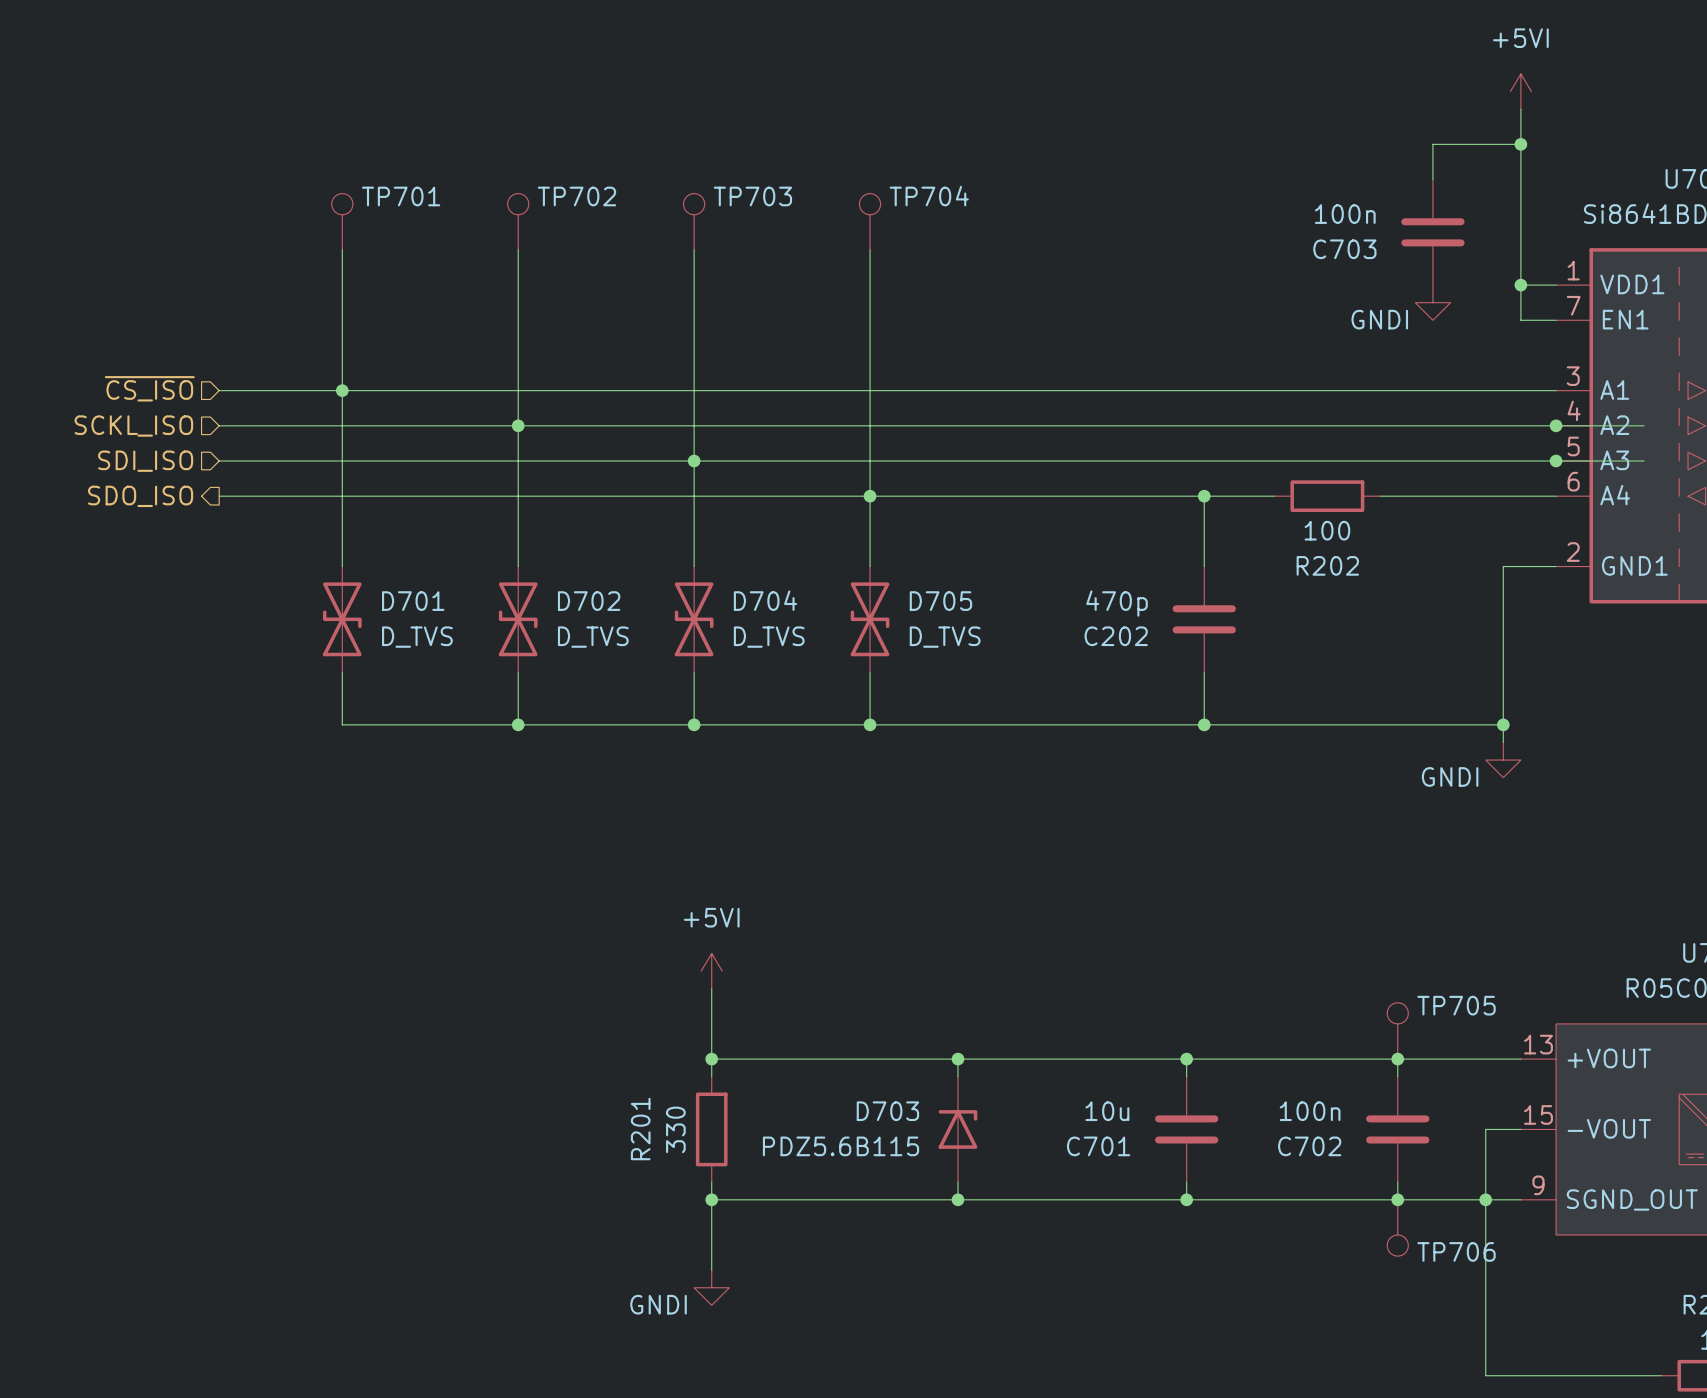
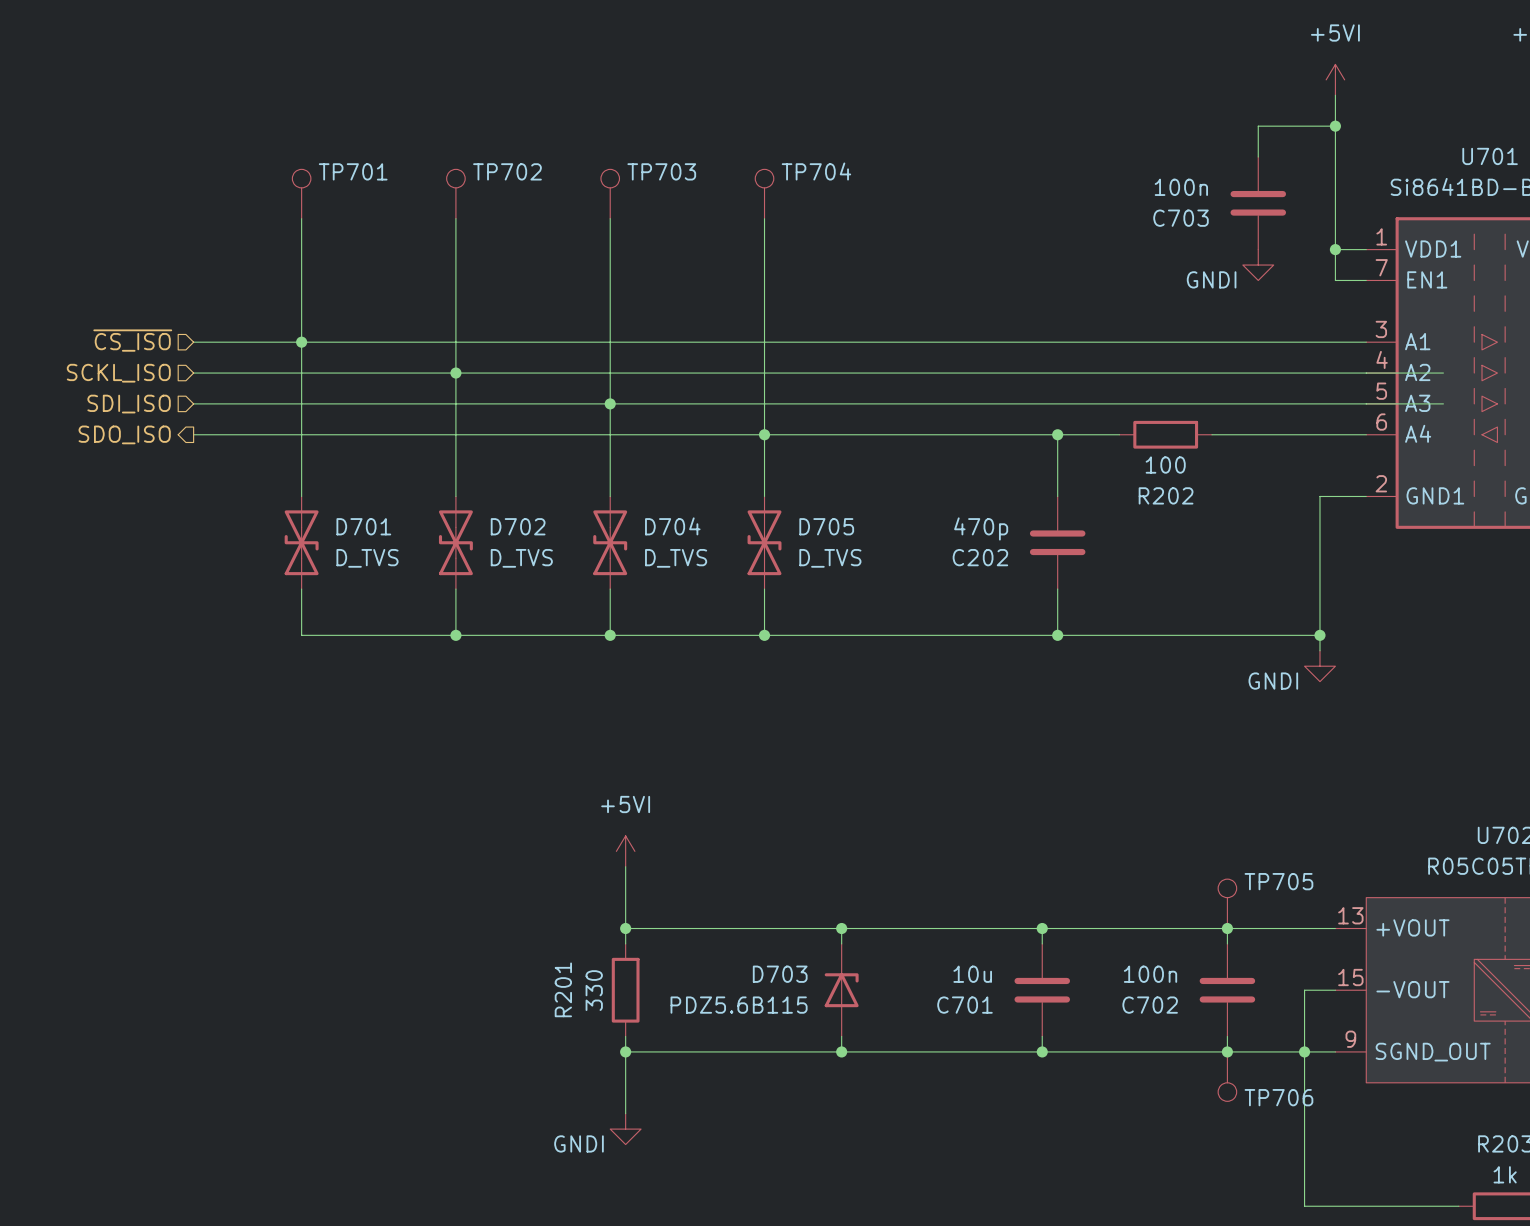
junction: (1556, 425) -> none
junction: (1556, 461) -> none

